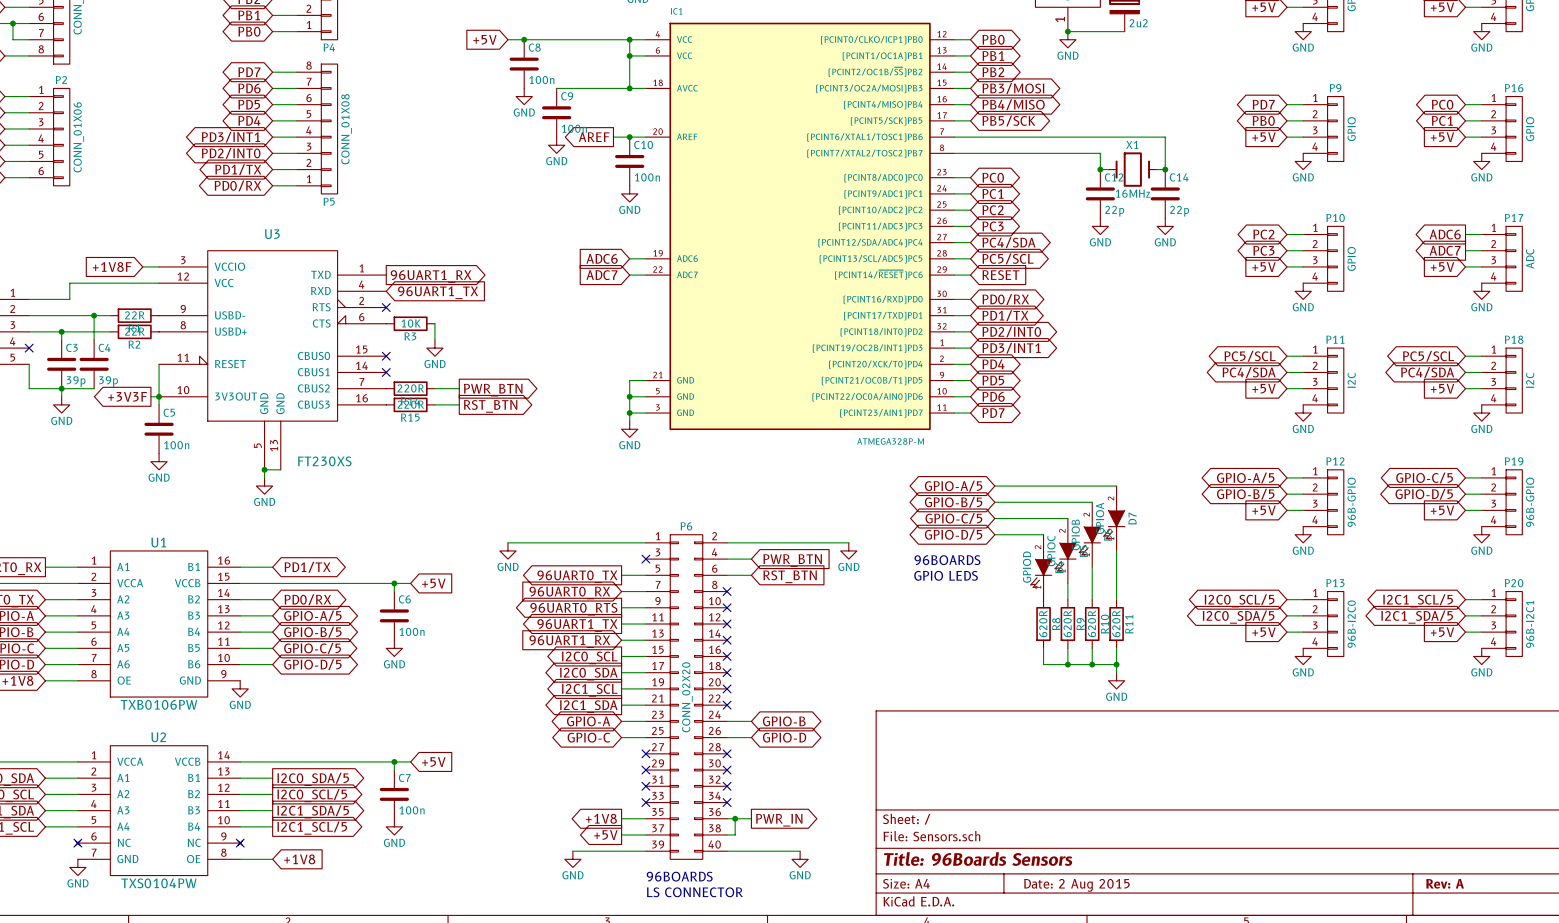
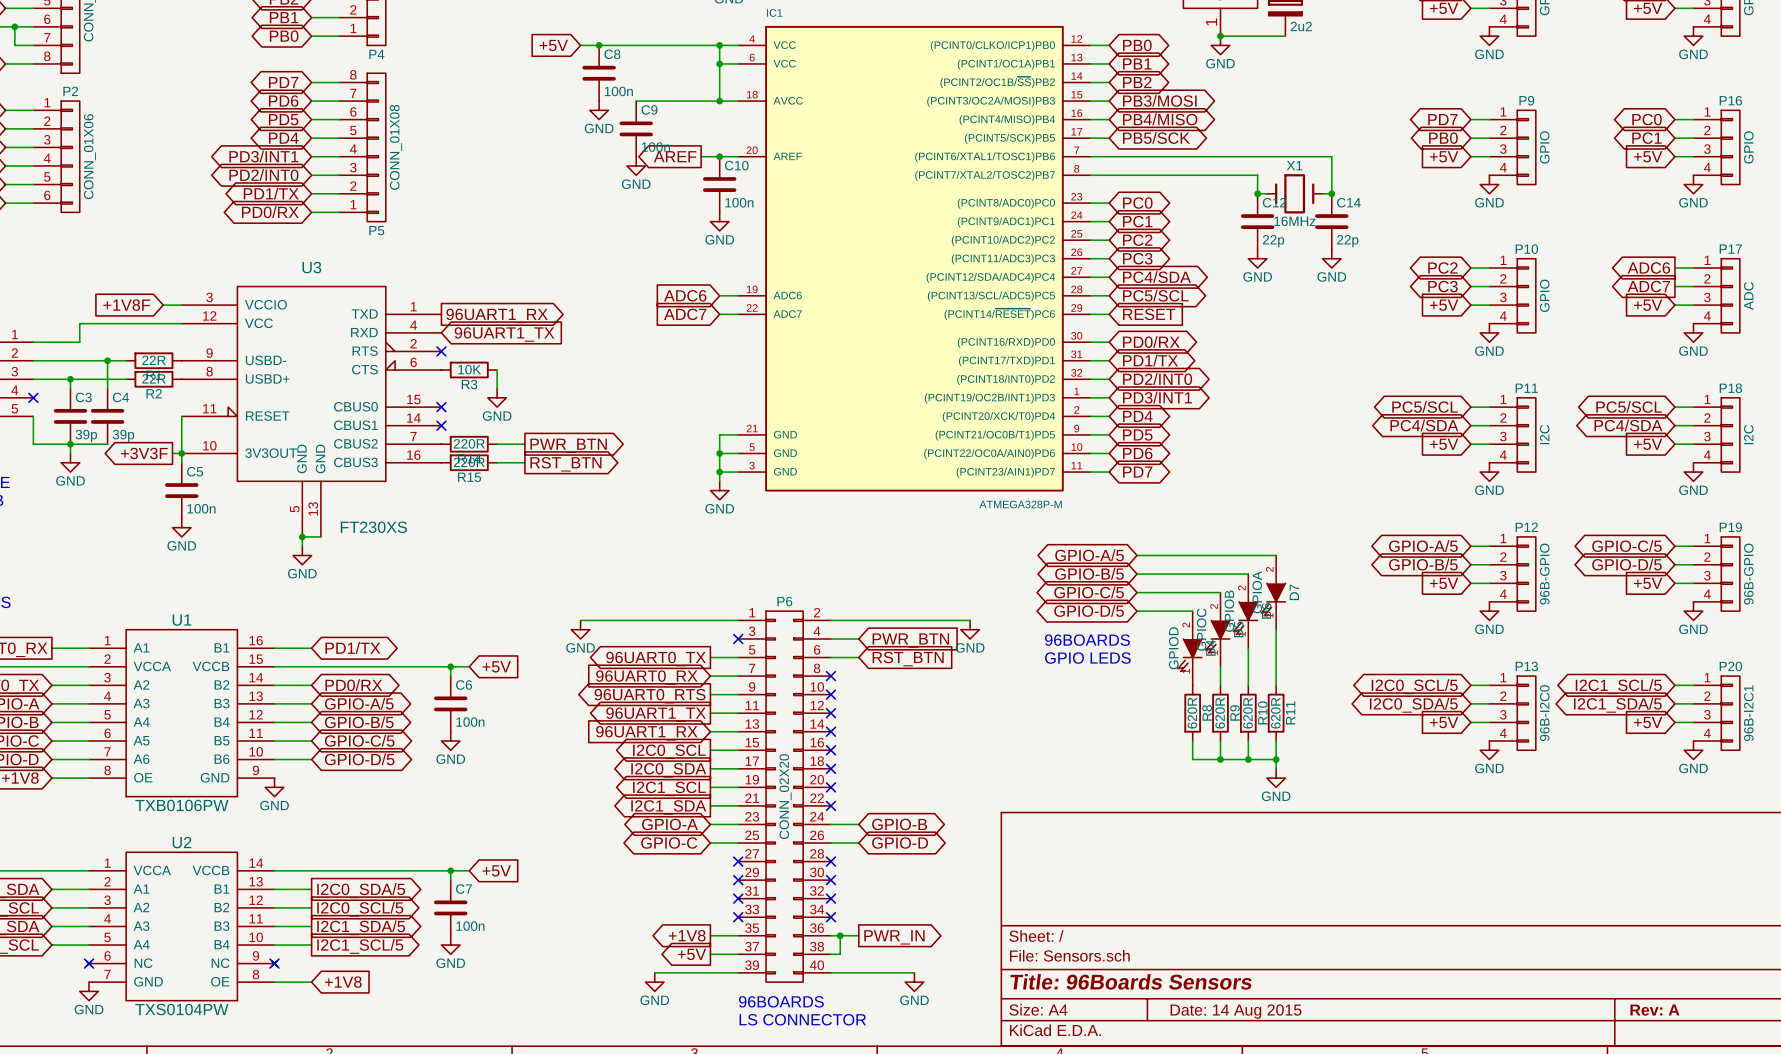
title block: Date: 2 Aug 2015 (1076, 885) -> Date: 14 Aug 2015 (1236, 1011)

